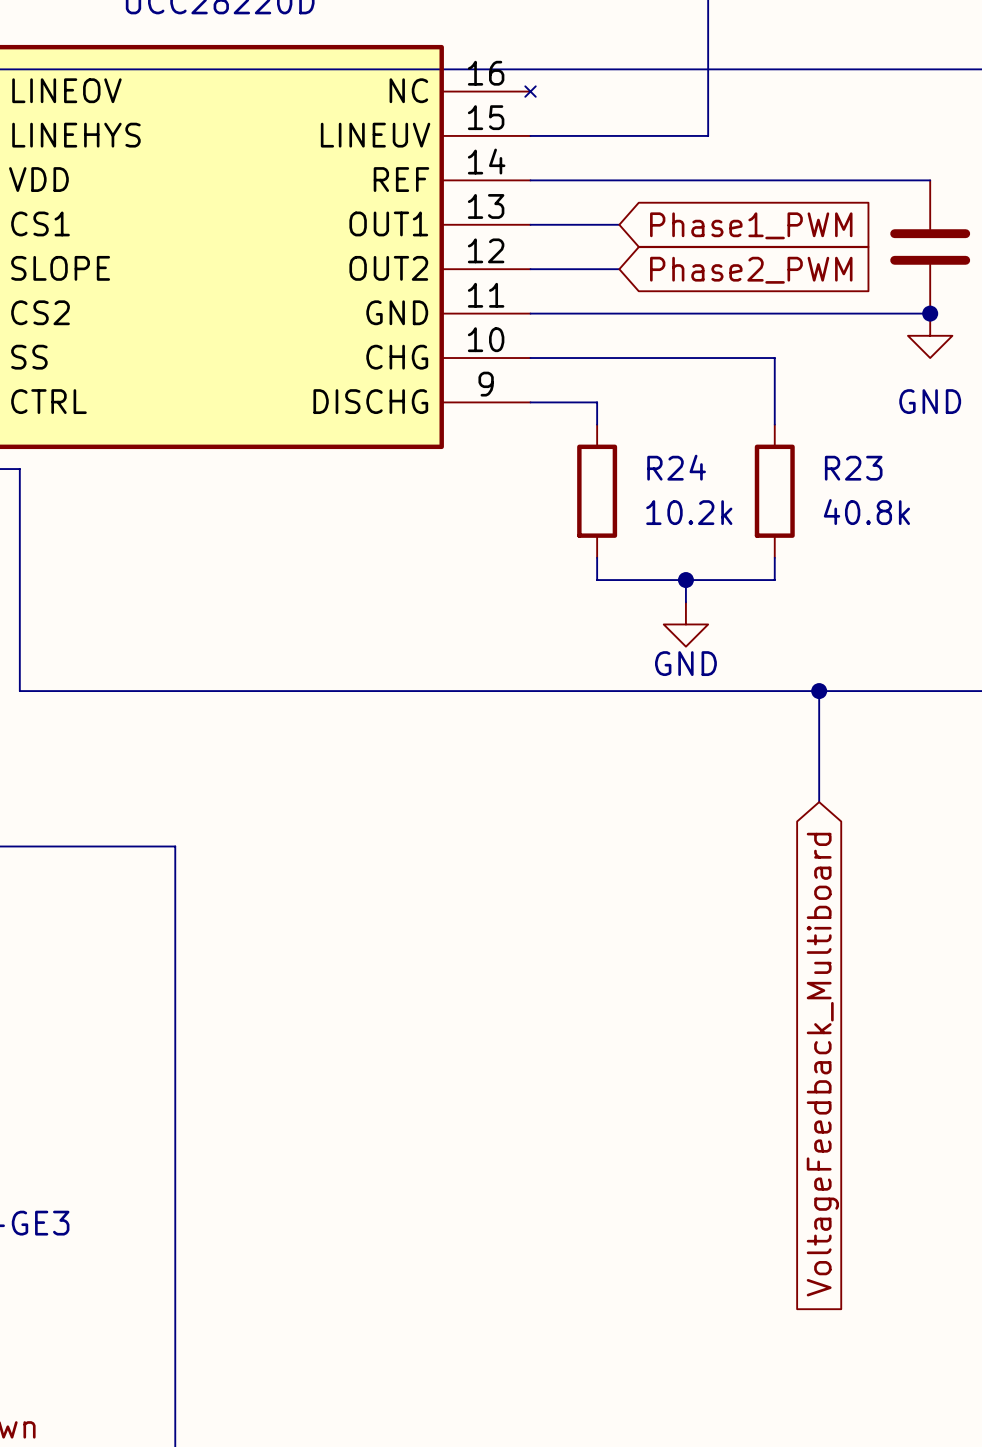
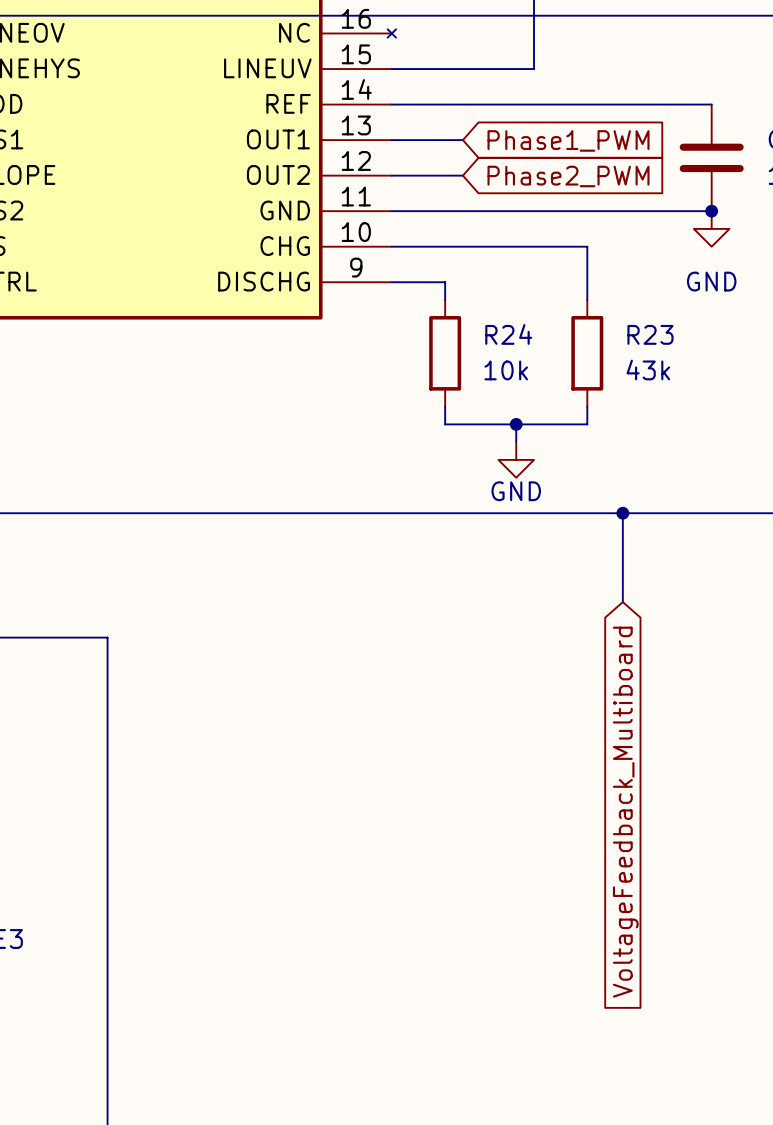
R24 value: 10.2k (689, 512) -> 10k (506, 370)
R23 value: 40.8k (866, 512) -> 43k (648, 369)

